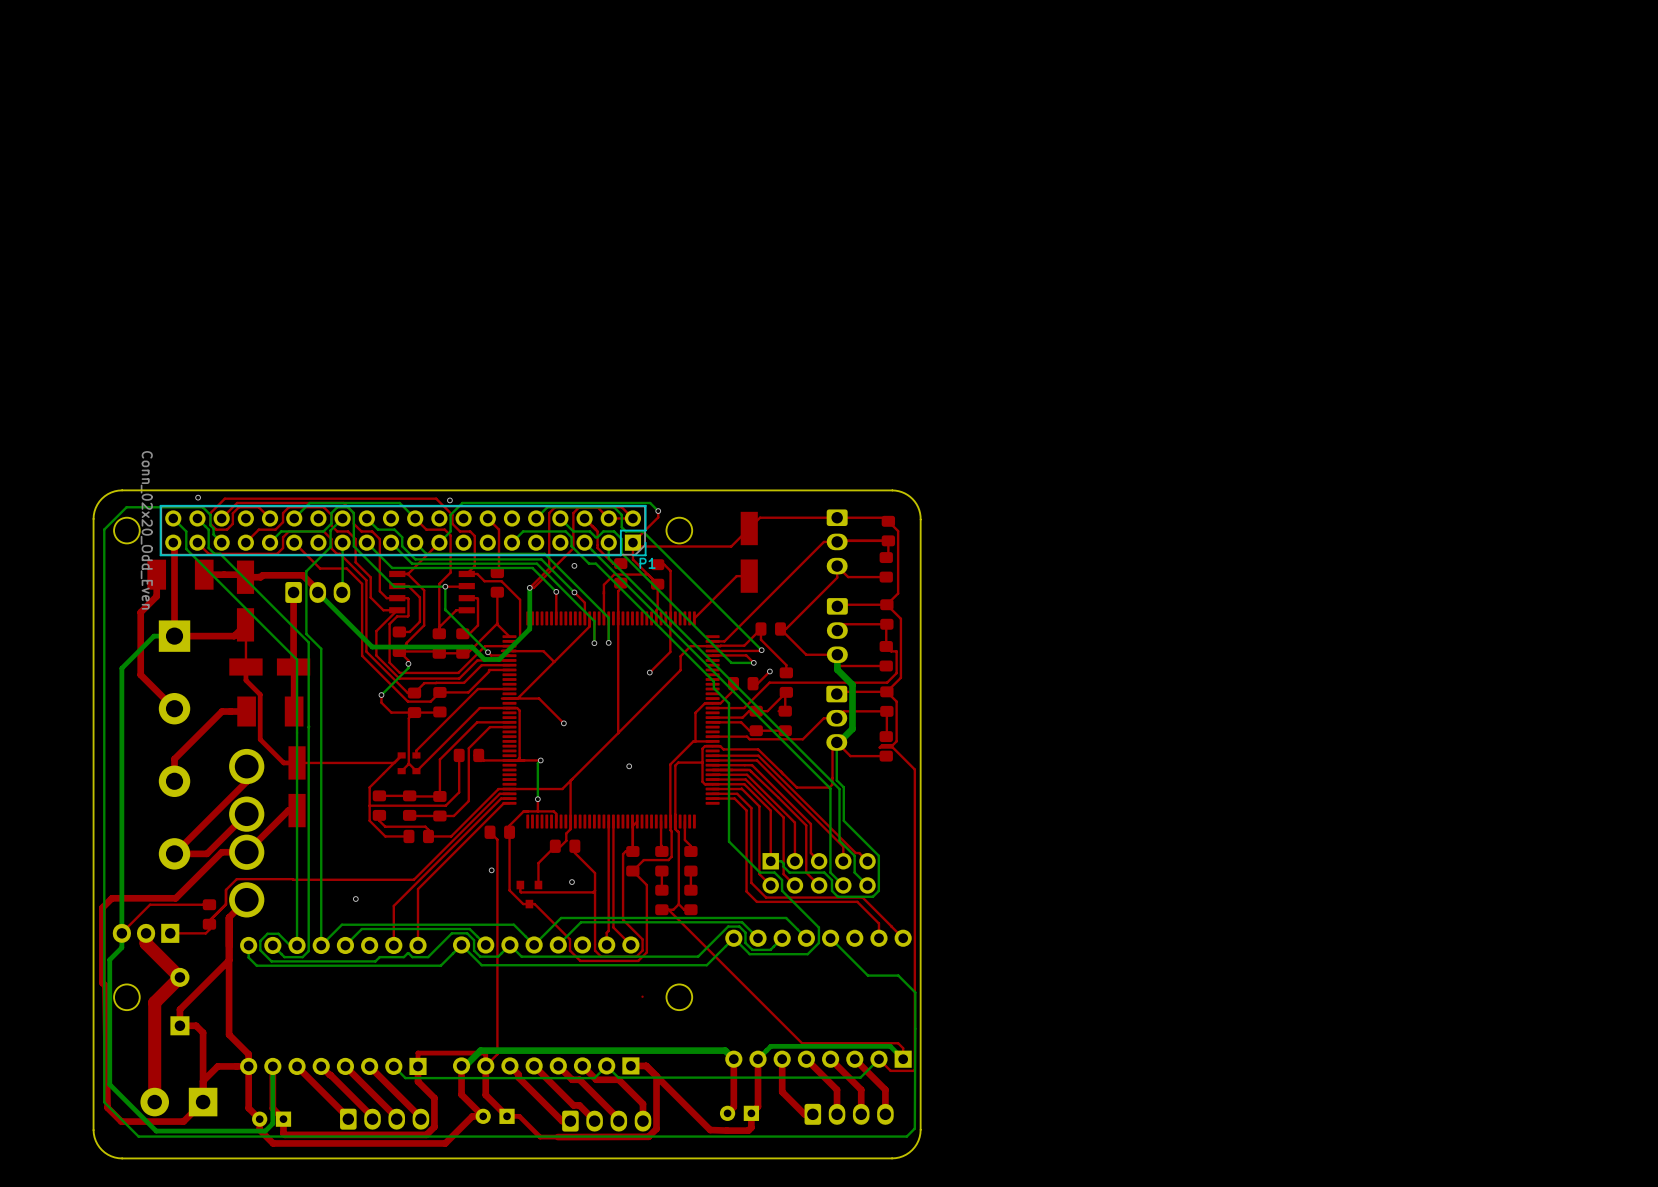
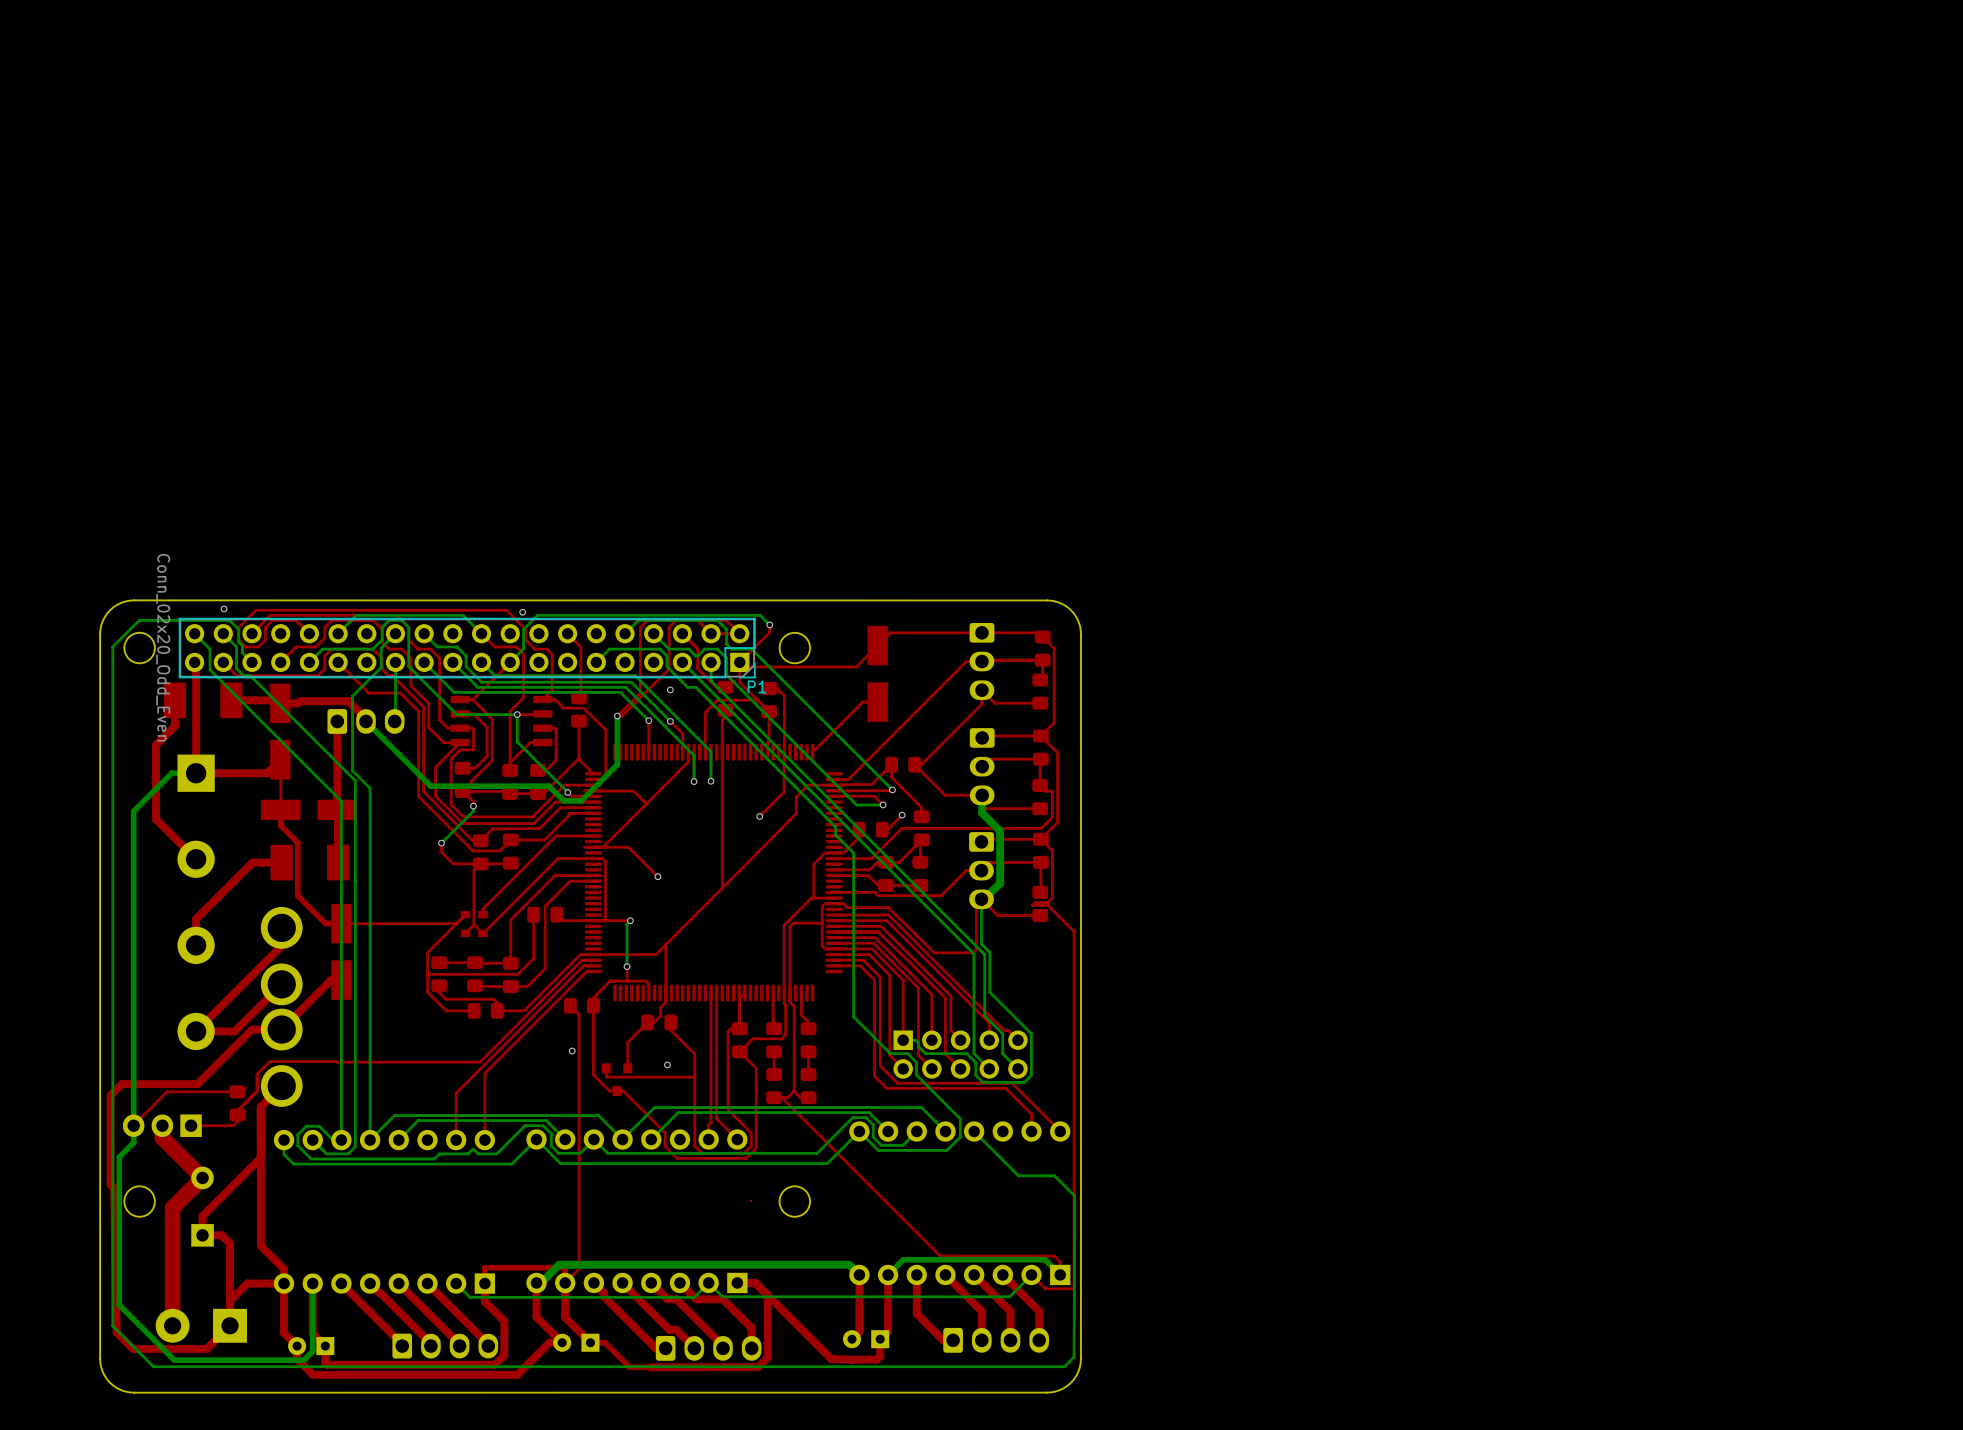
via: (629, 766) -> none
via: (355, 899) -> none

